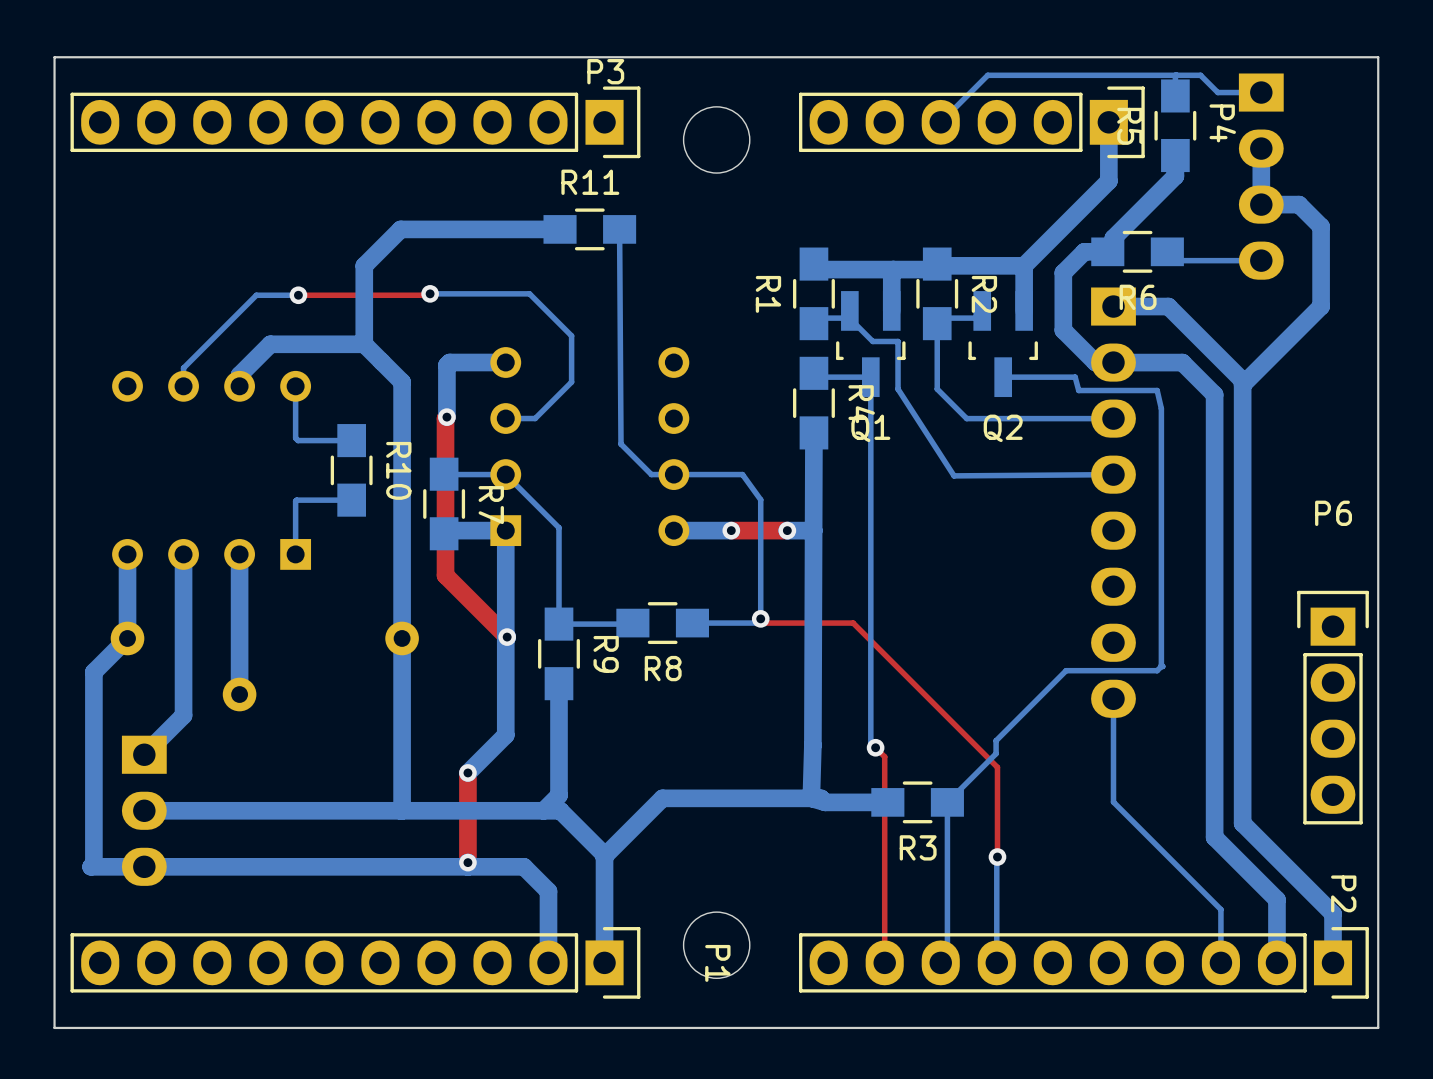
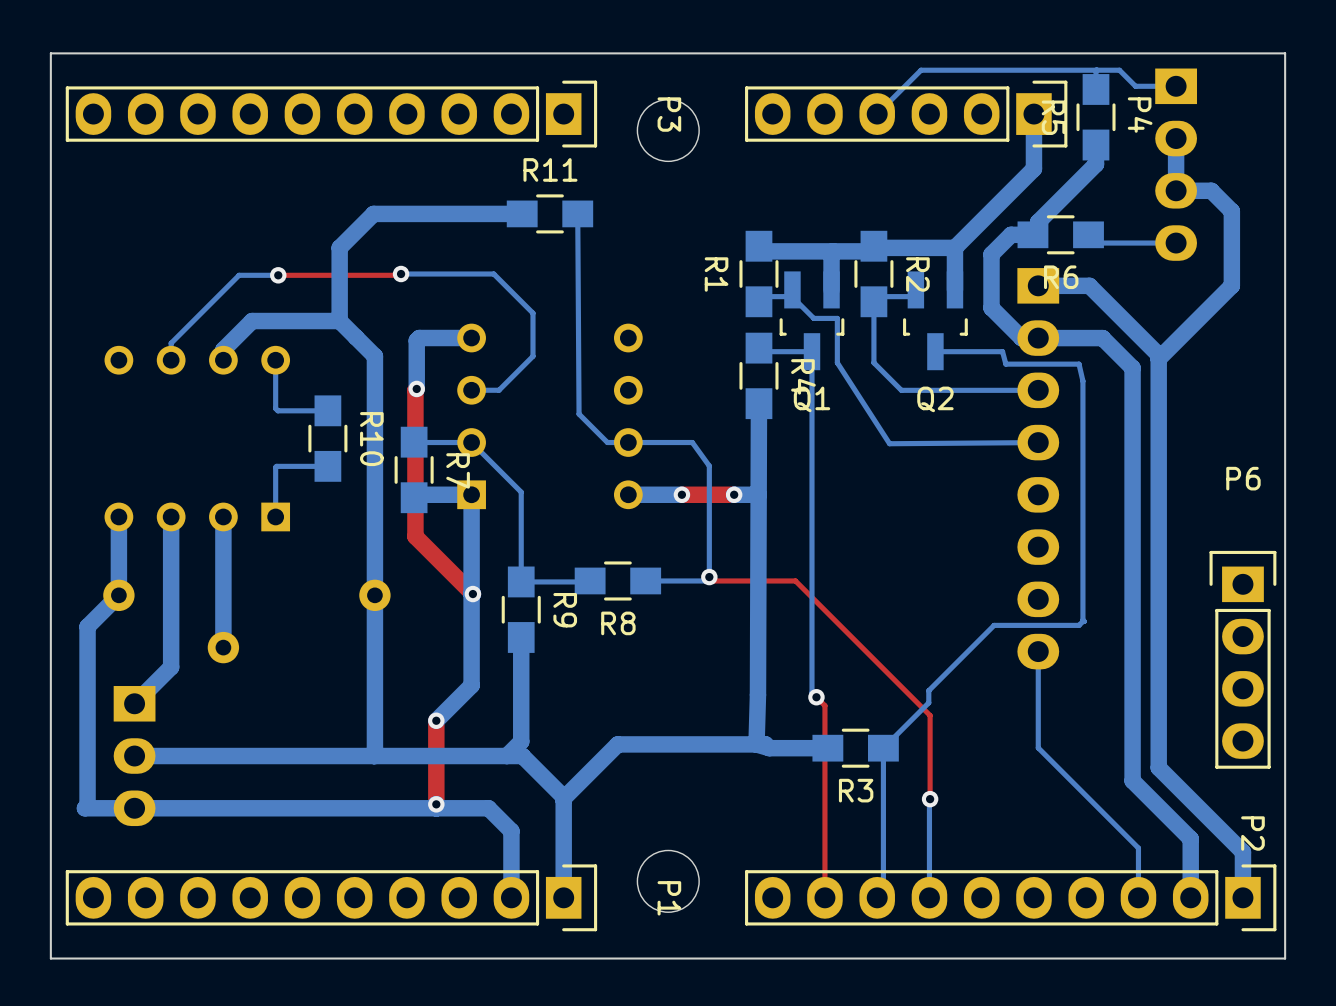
P3 name rotation: 0° (605, 71) -> 90° clockwise (669, 114)
P3 name position: P3 (605, 71) -> P3 (669, 114)

